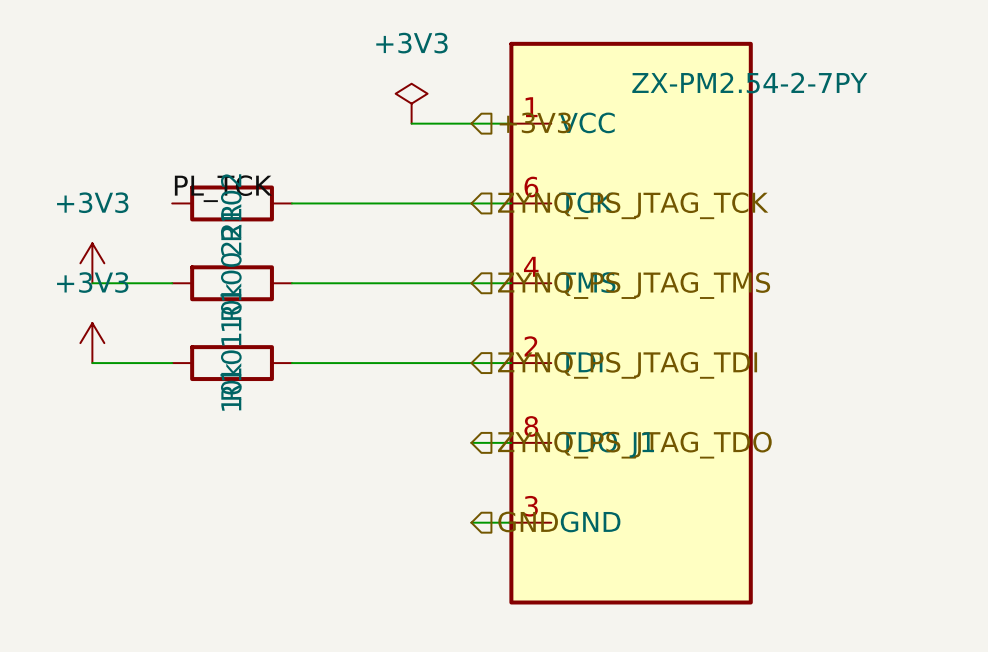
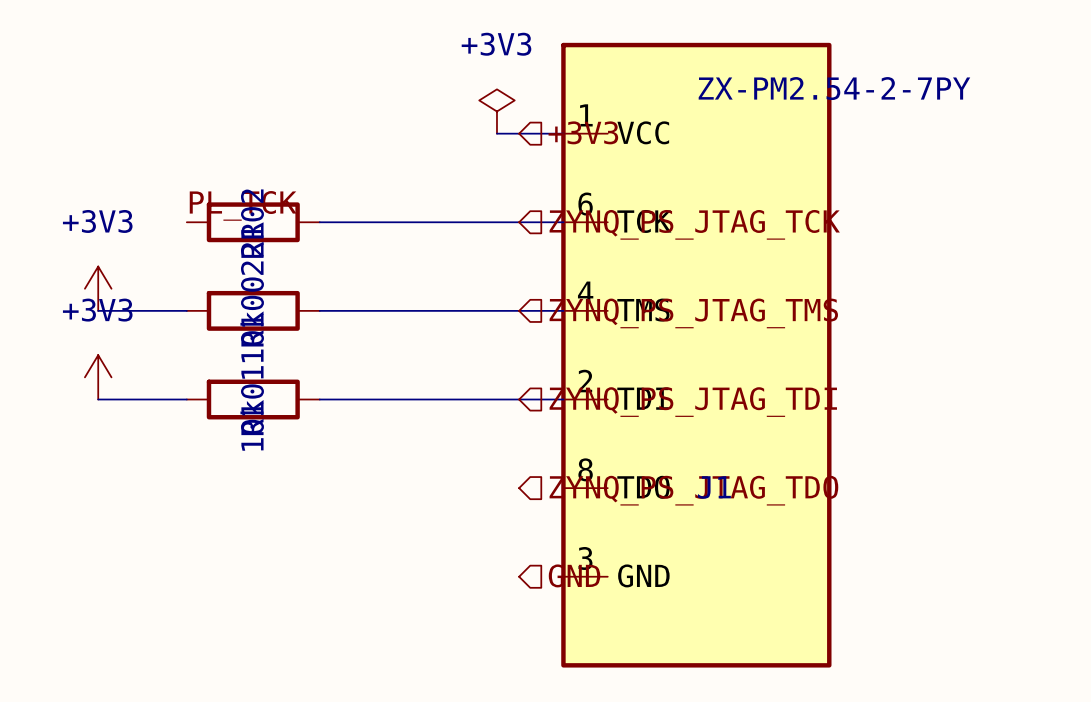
power symbol position: +3V3 (411, 103) -> +3V3 (496, 111)
wire: (411, 123) (451, 123) -> none
wire: (471, 442) (511, 442) -> none
wire: (471, 522) (511, 522) -> none

